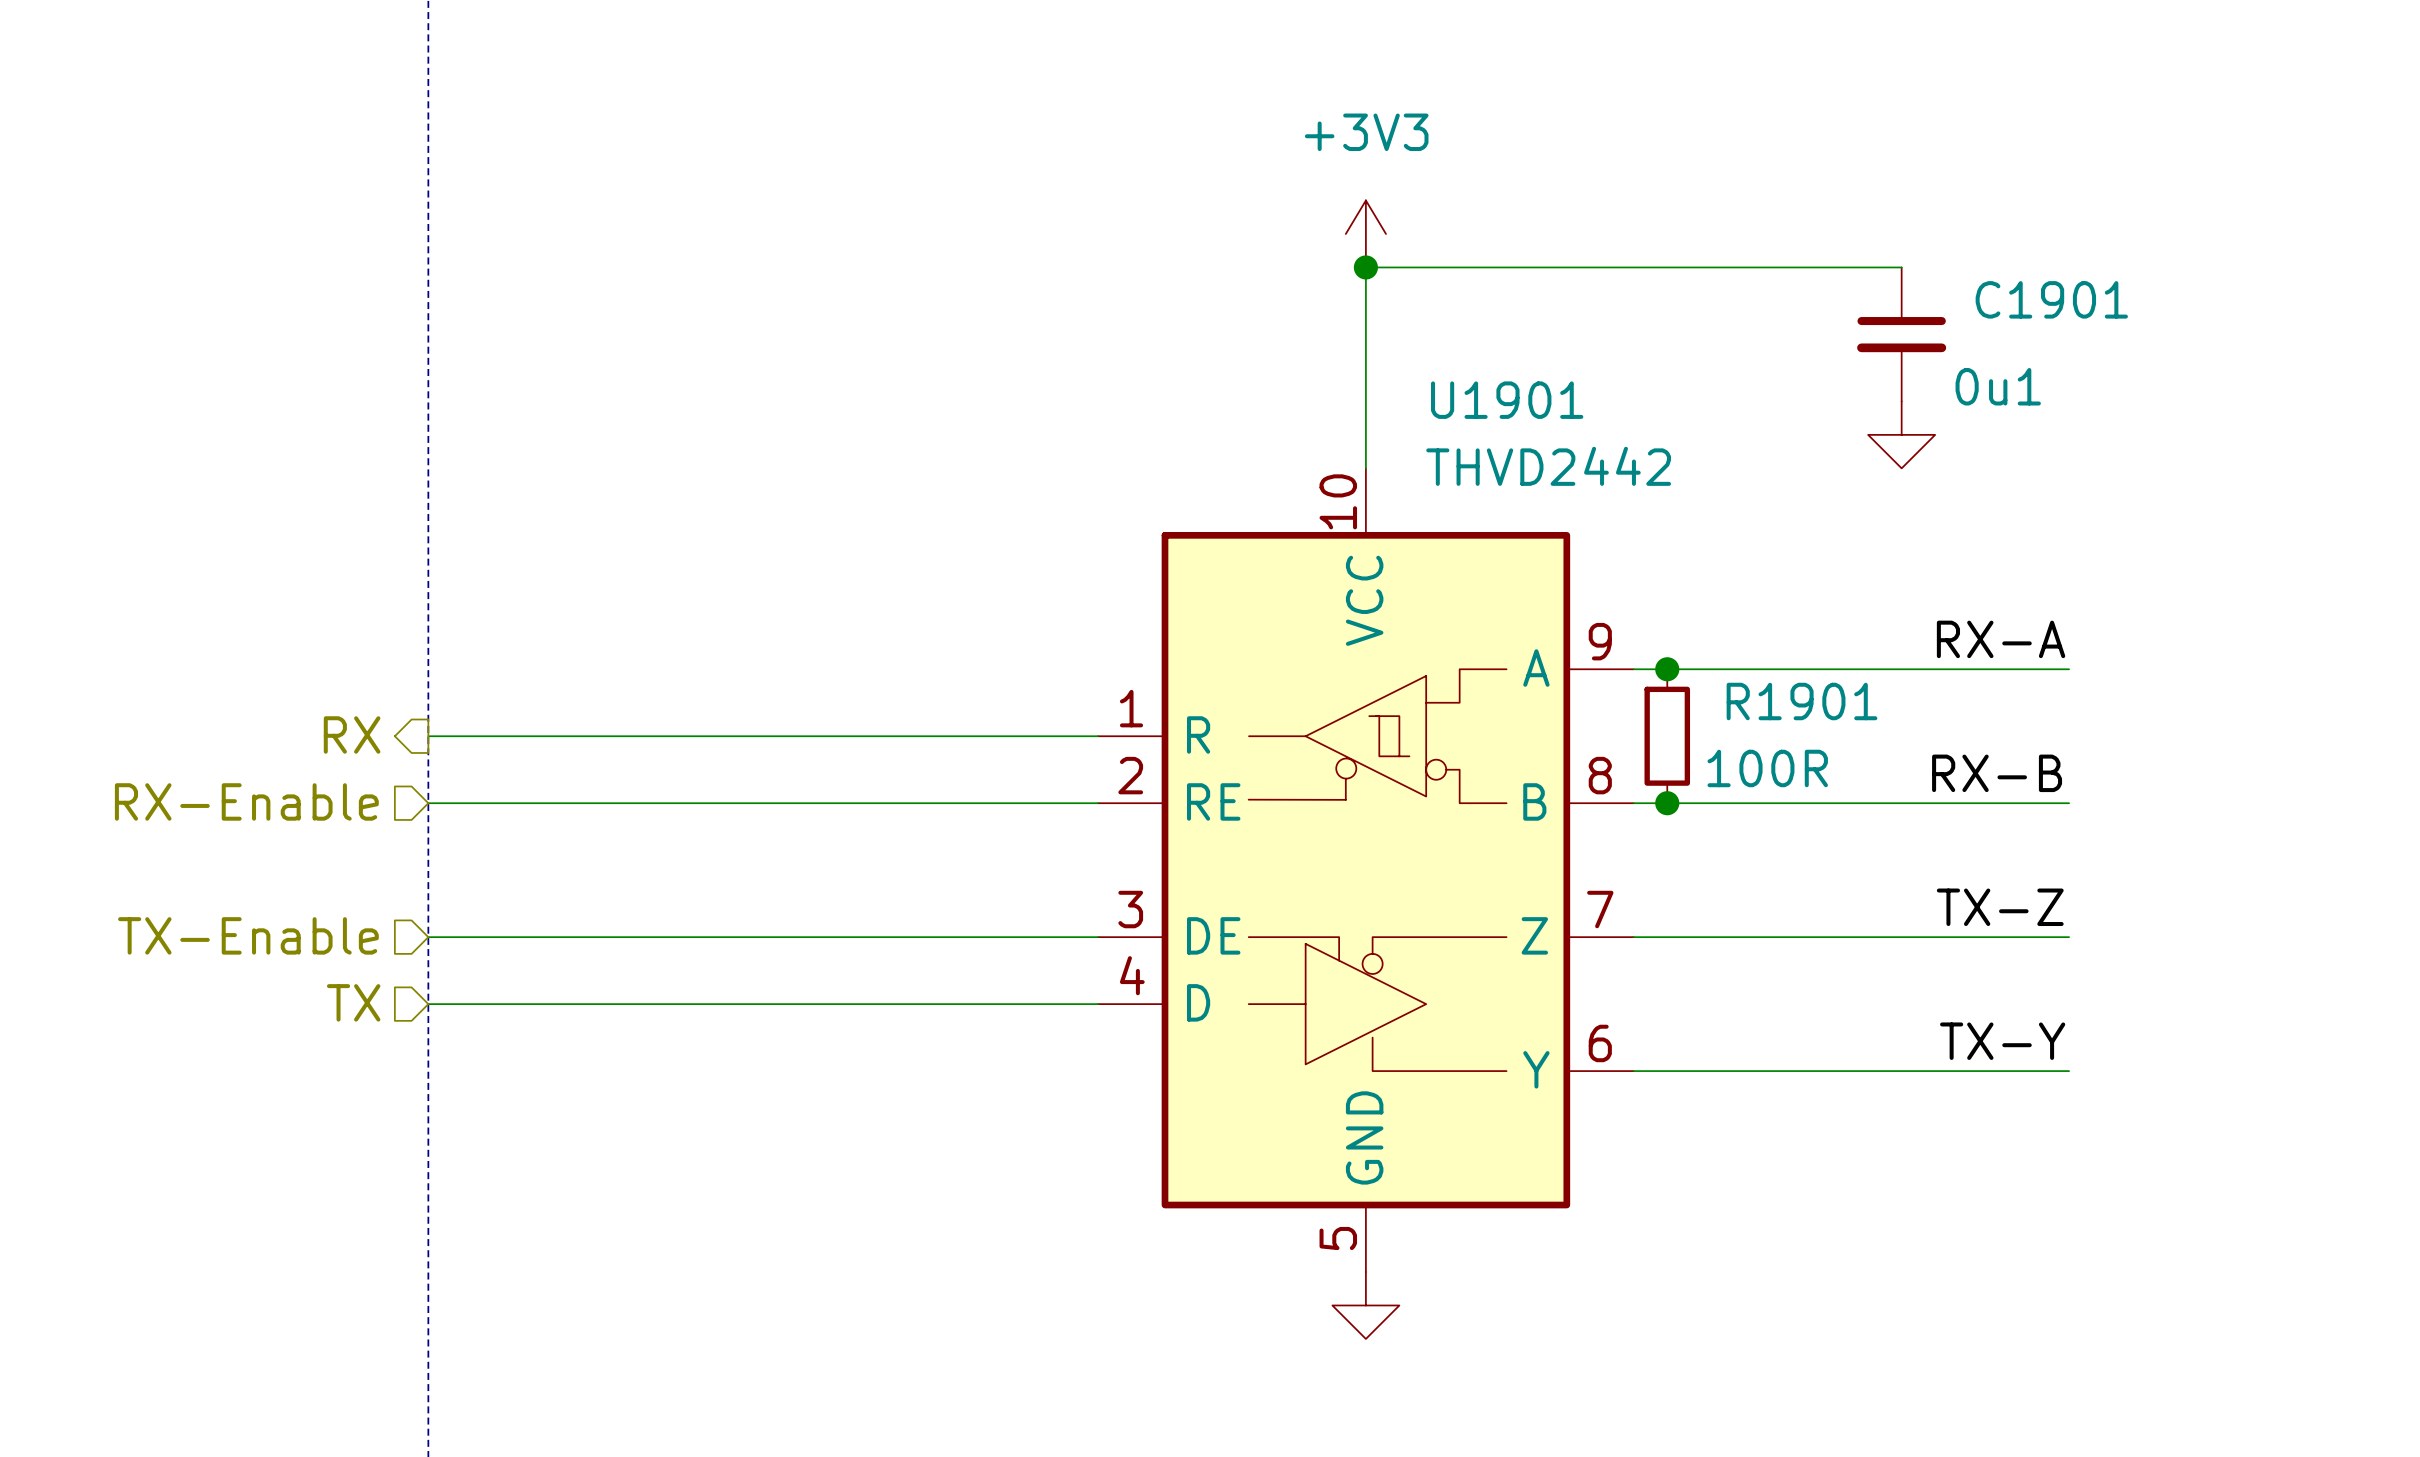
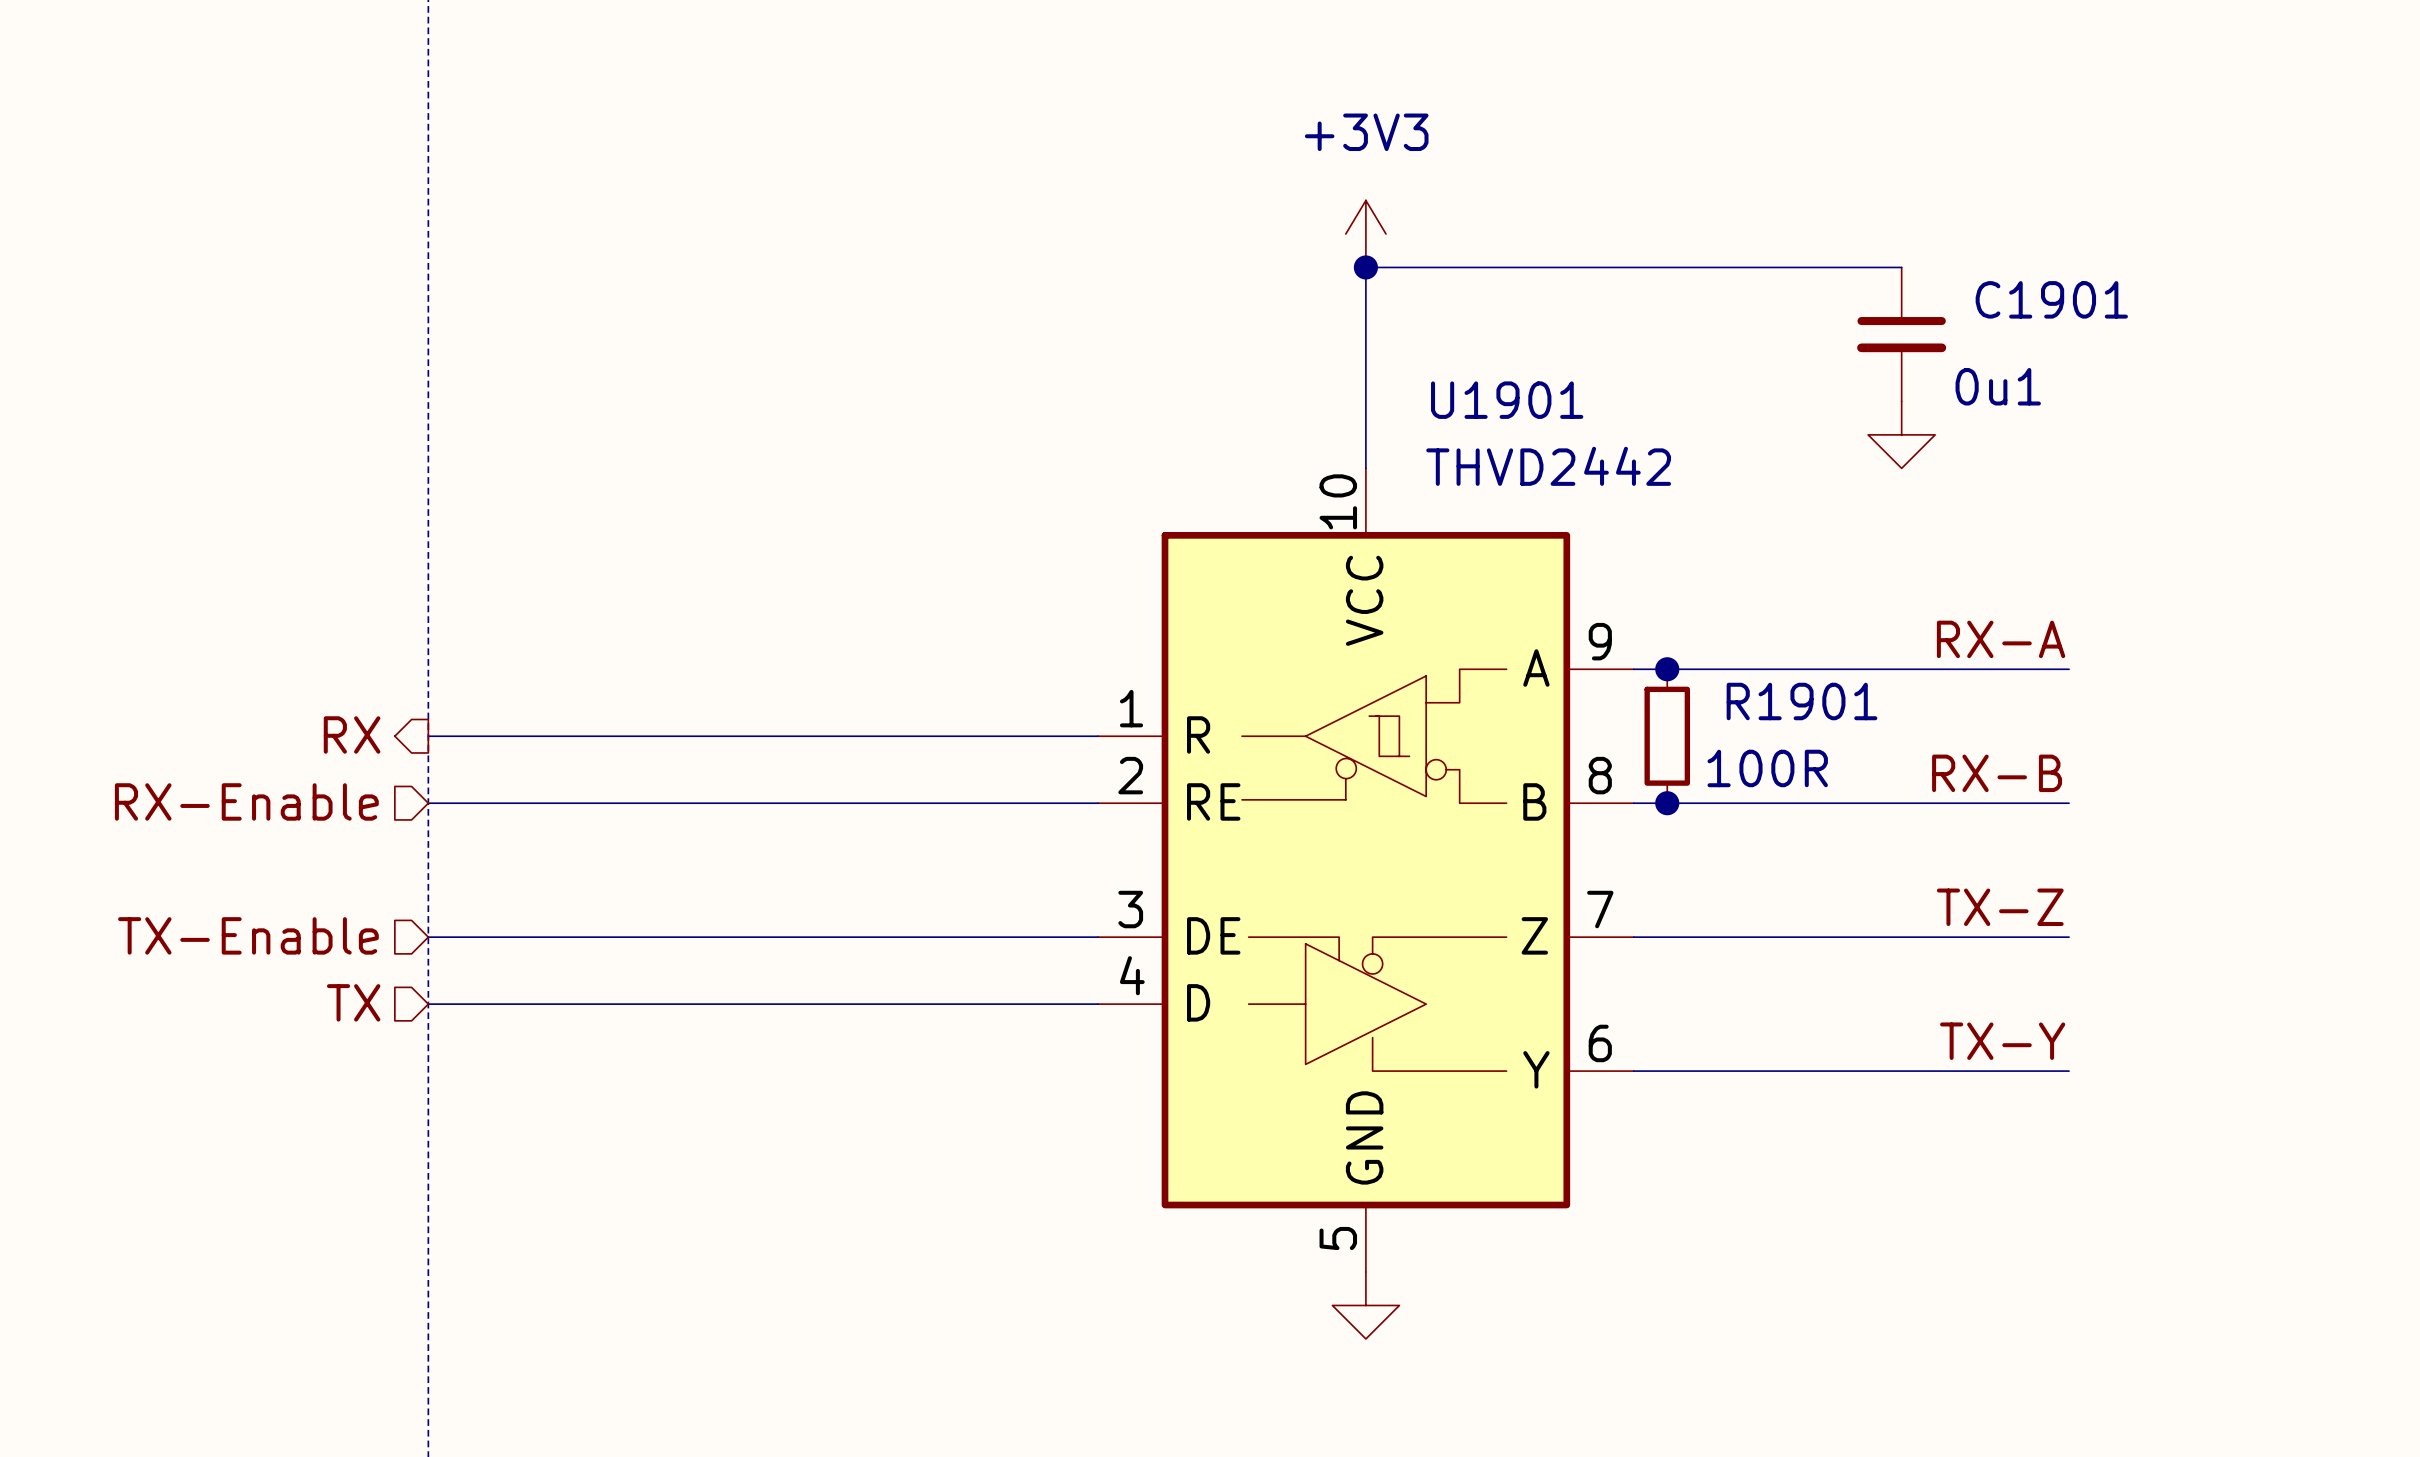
U1901 symbol: [1098, 468, 1634, 1272] -> [1098, 468, 1634, 1272]

